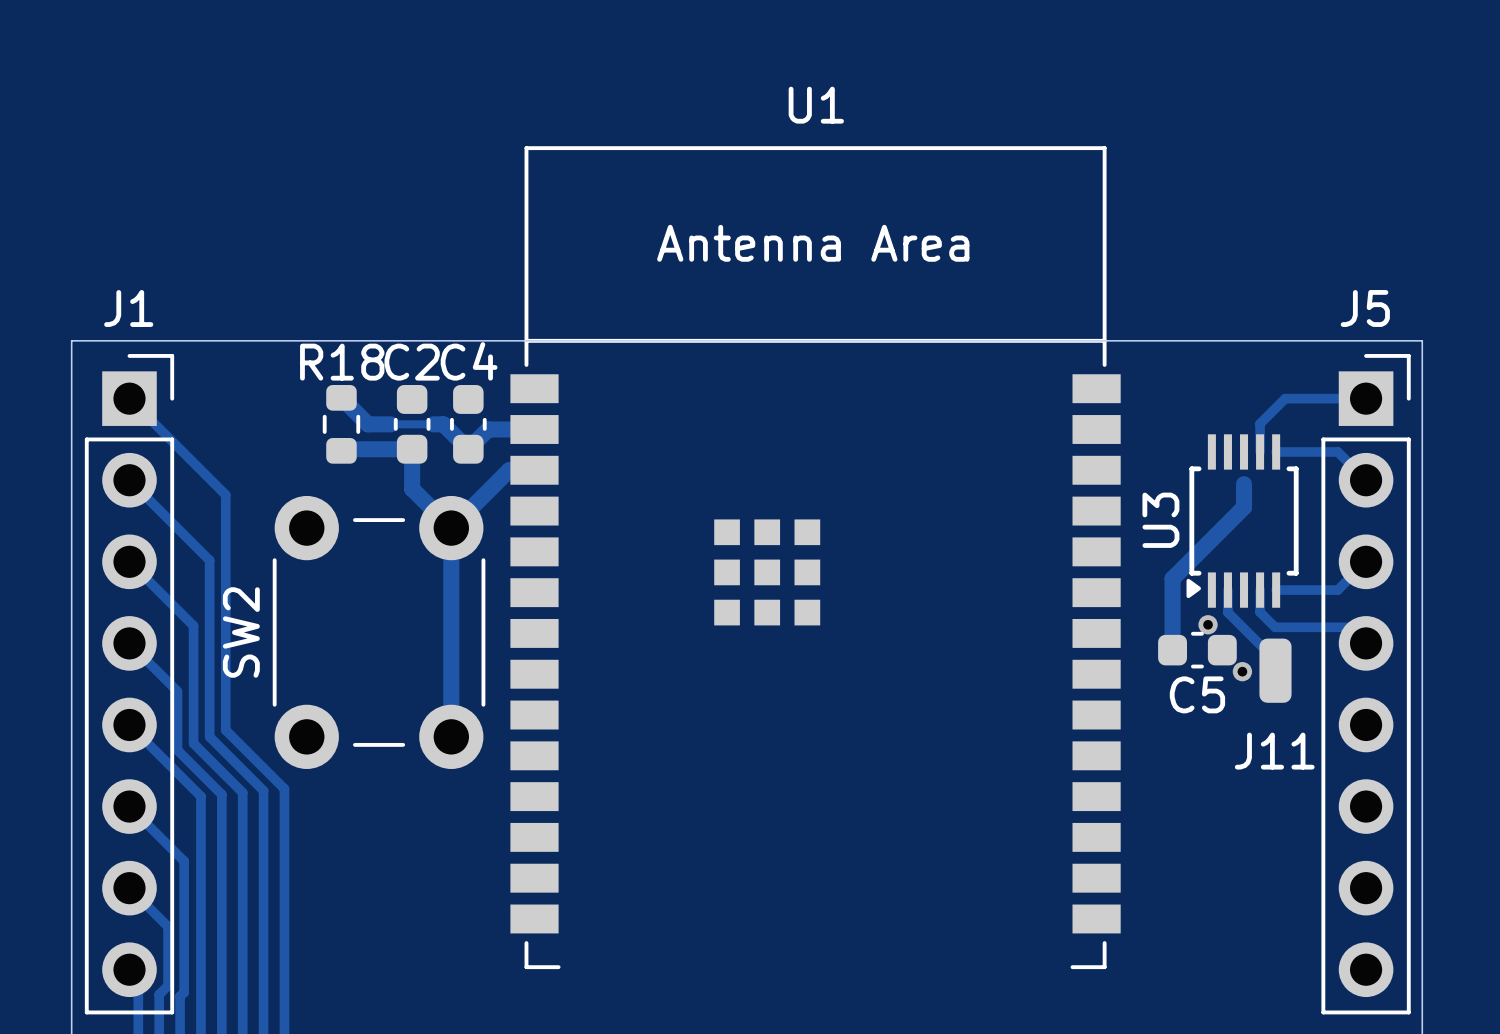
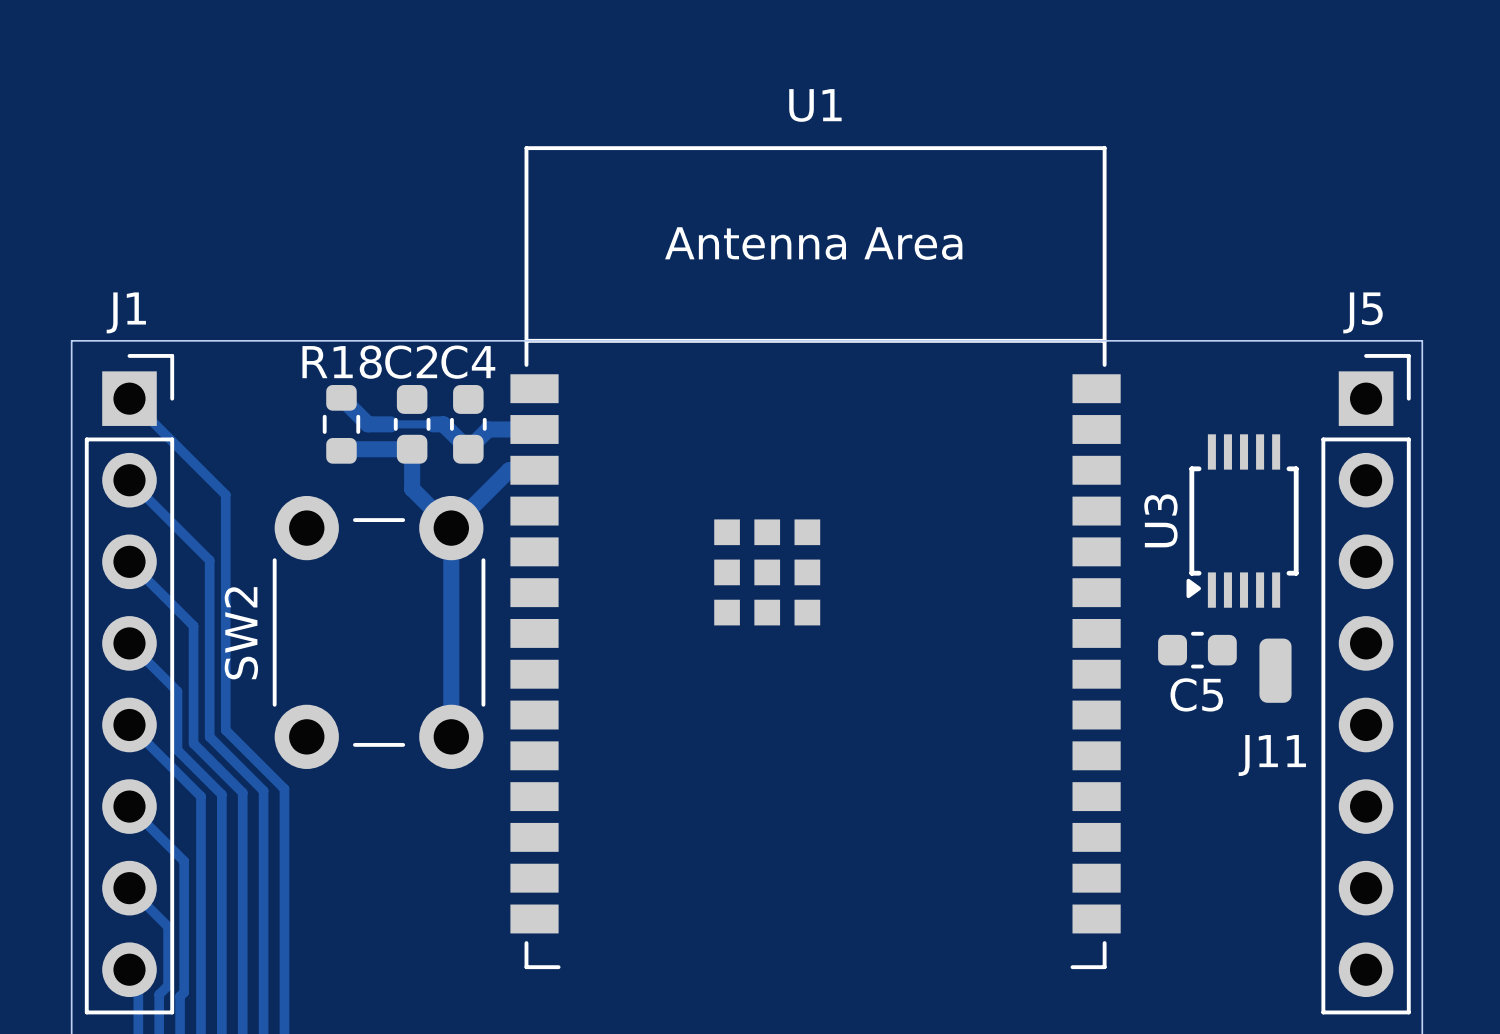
track: (1366, 398) (1285, 398) (1260, 423) (1260, 451) -> none
track: (1276, 451) (1337, 451) (1366, 480) -> none
track: (1244, 484) (1244, 507) (1172, 578) (1172, 650) -> none
track: (1366, 561) (1337, 590) (1276, 590) -> none
track: (1227, 590) (1227, 612) (1275, 660) (1275, 670) -> none
track: (1260, 590) (1260, 612) (1275, 627) (1349, 627) (1366, 643) -> none
via: (1208, 624) -> none
via: (1242, 671) -> none

